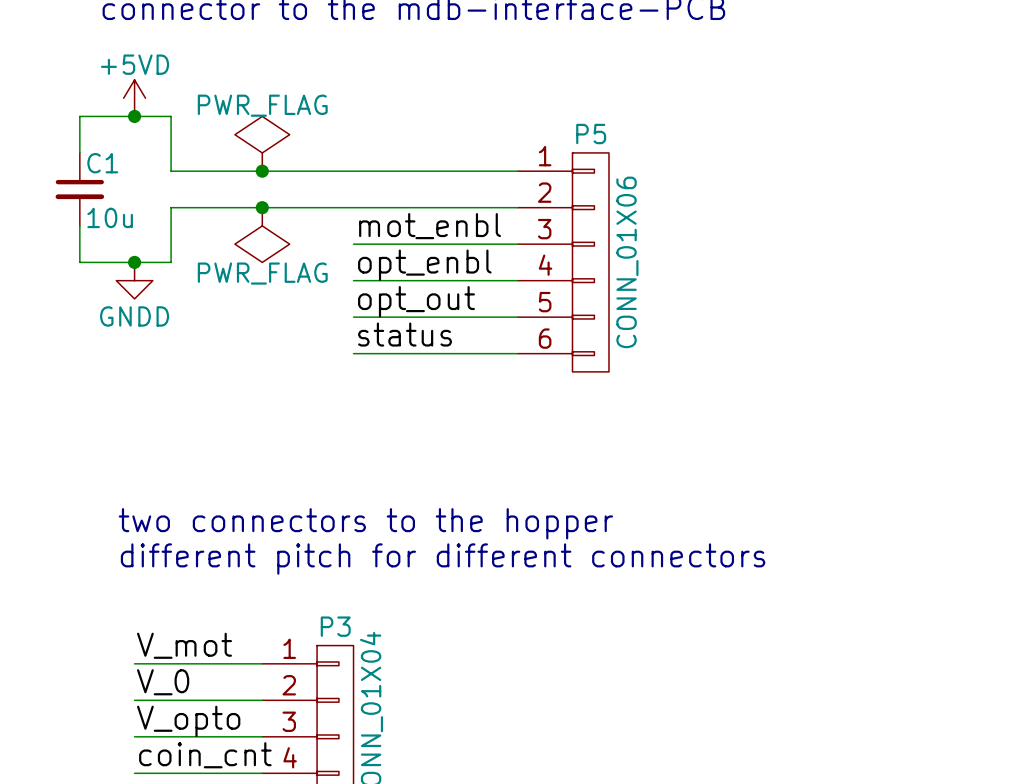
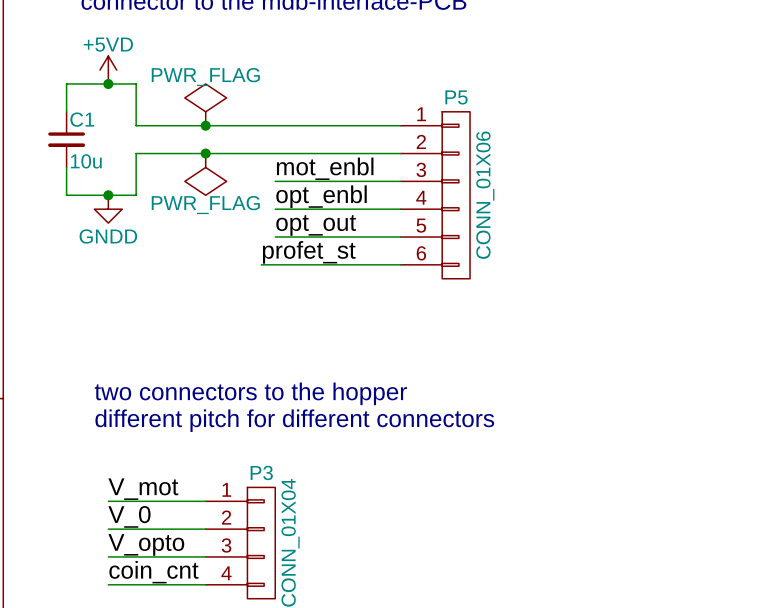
label: status (405, 334) -> none
label: none -> profet_st (309, 252)
wire: none -> (261, 264) (275, 264)

